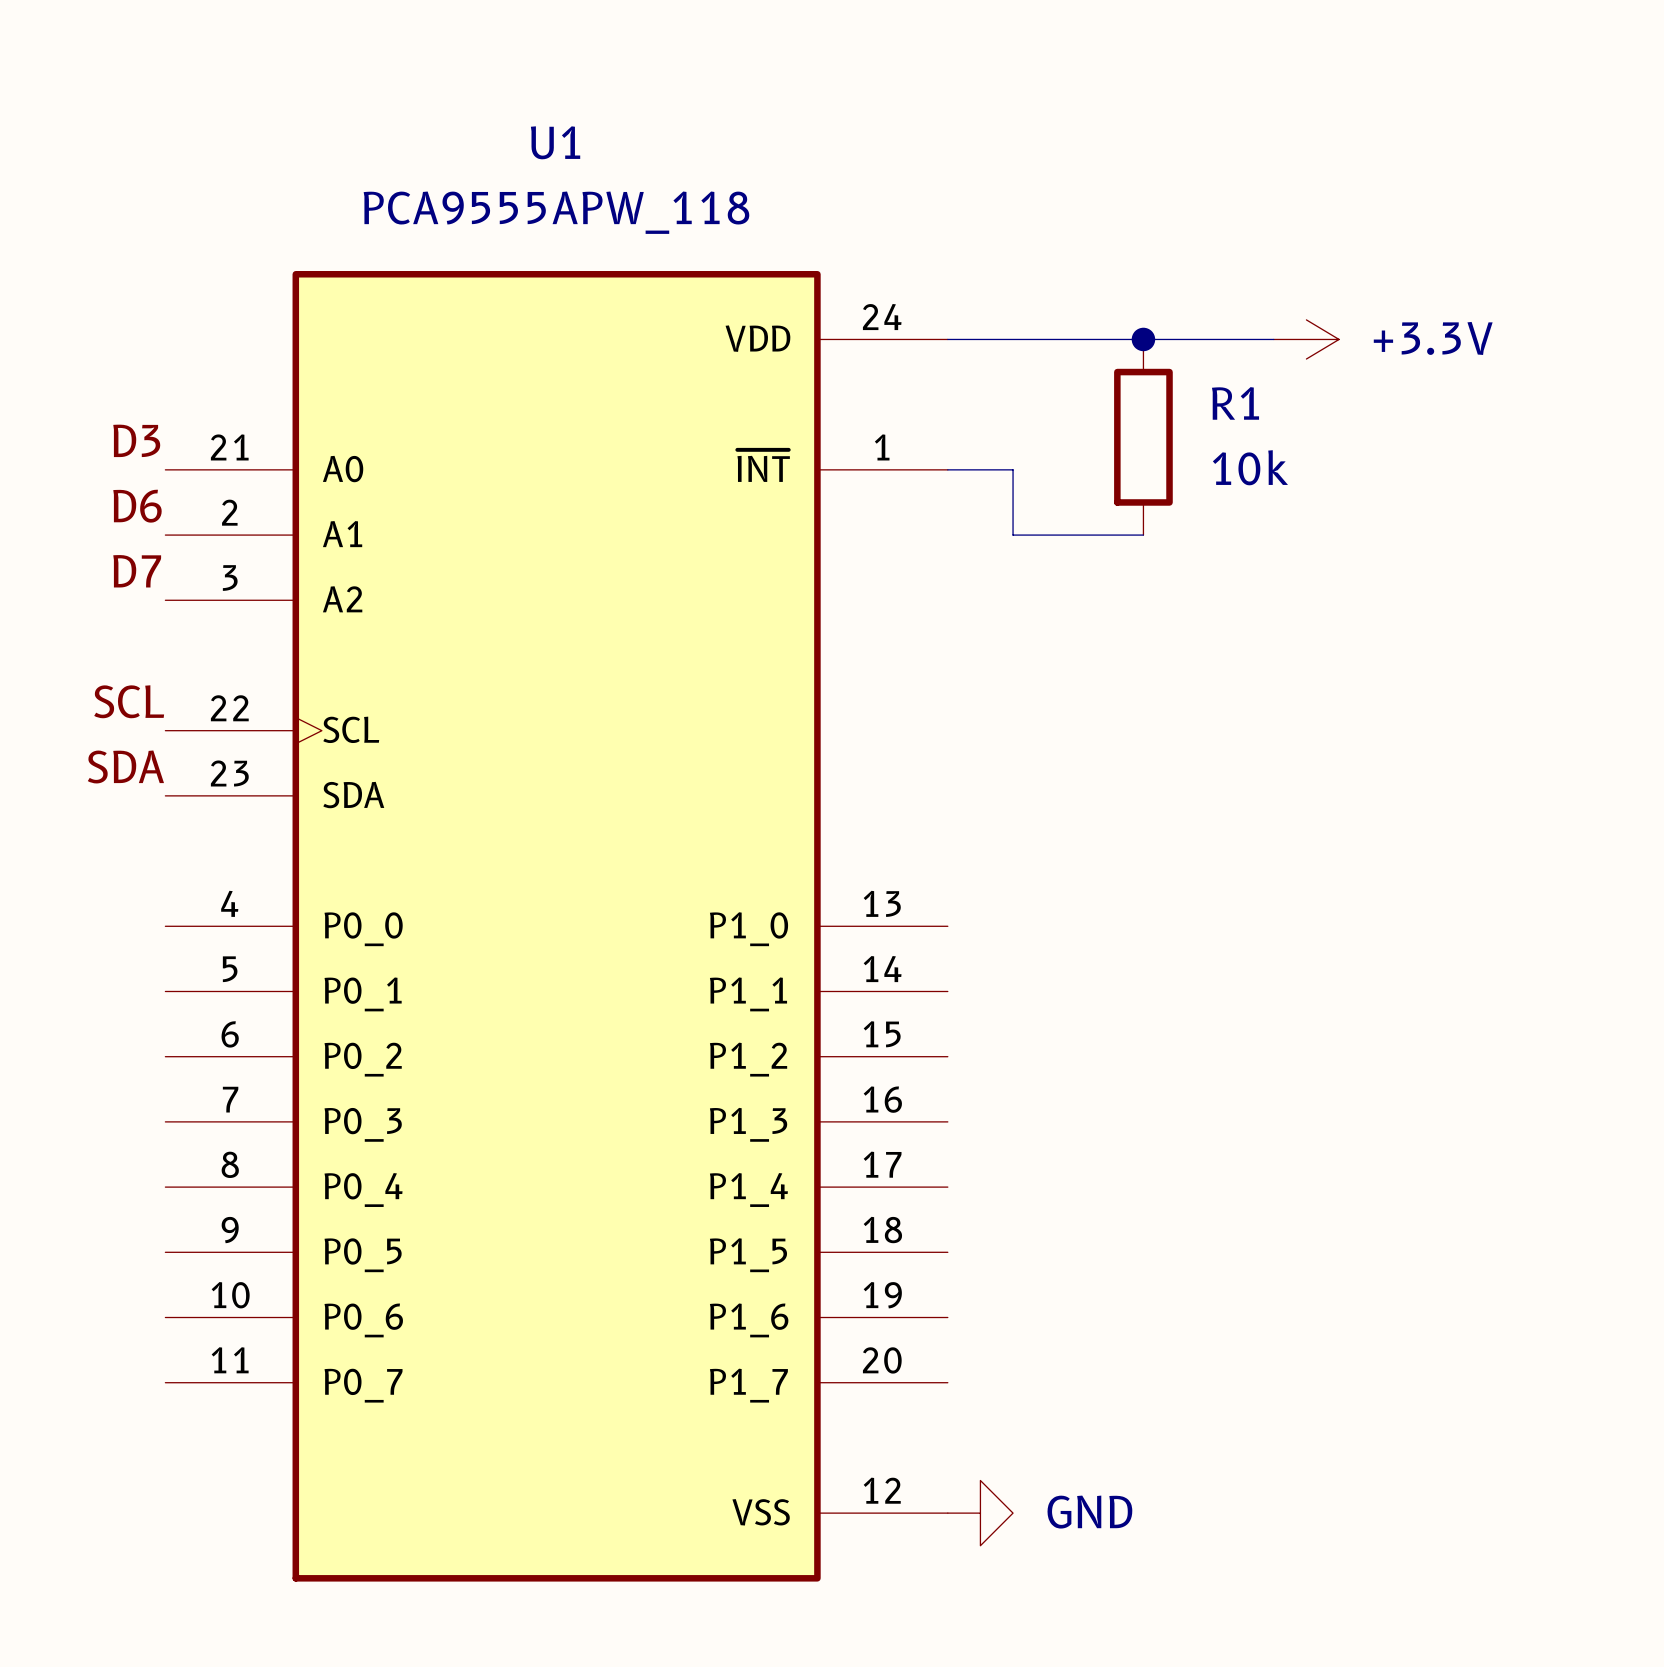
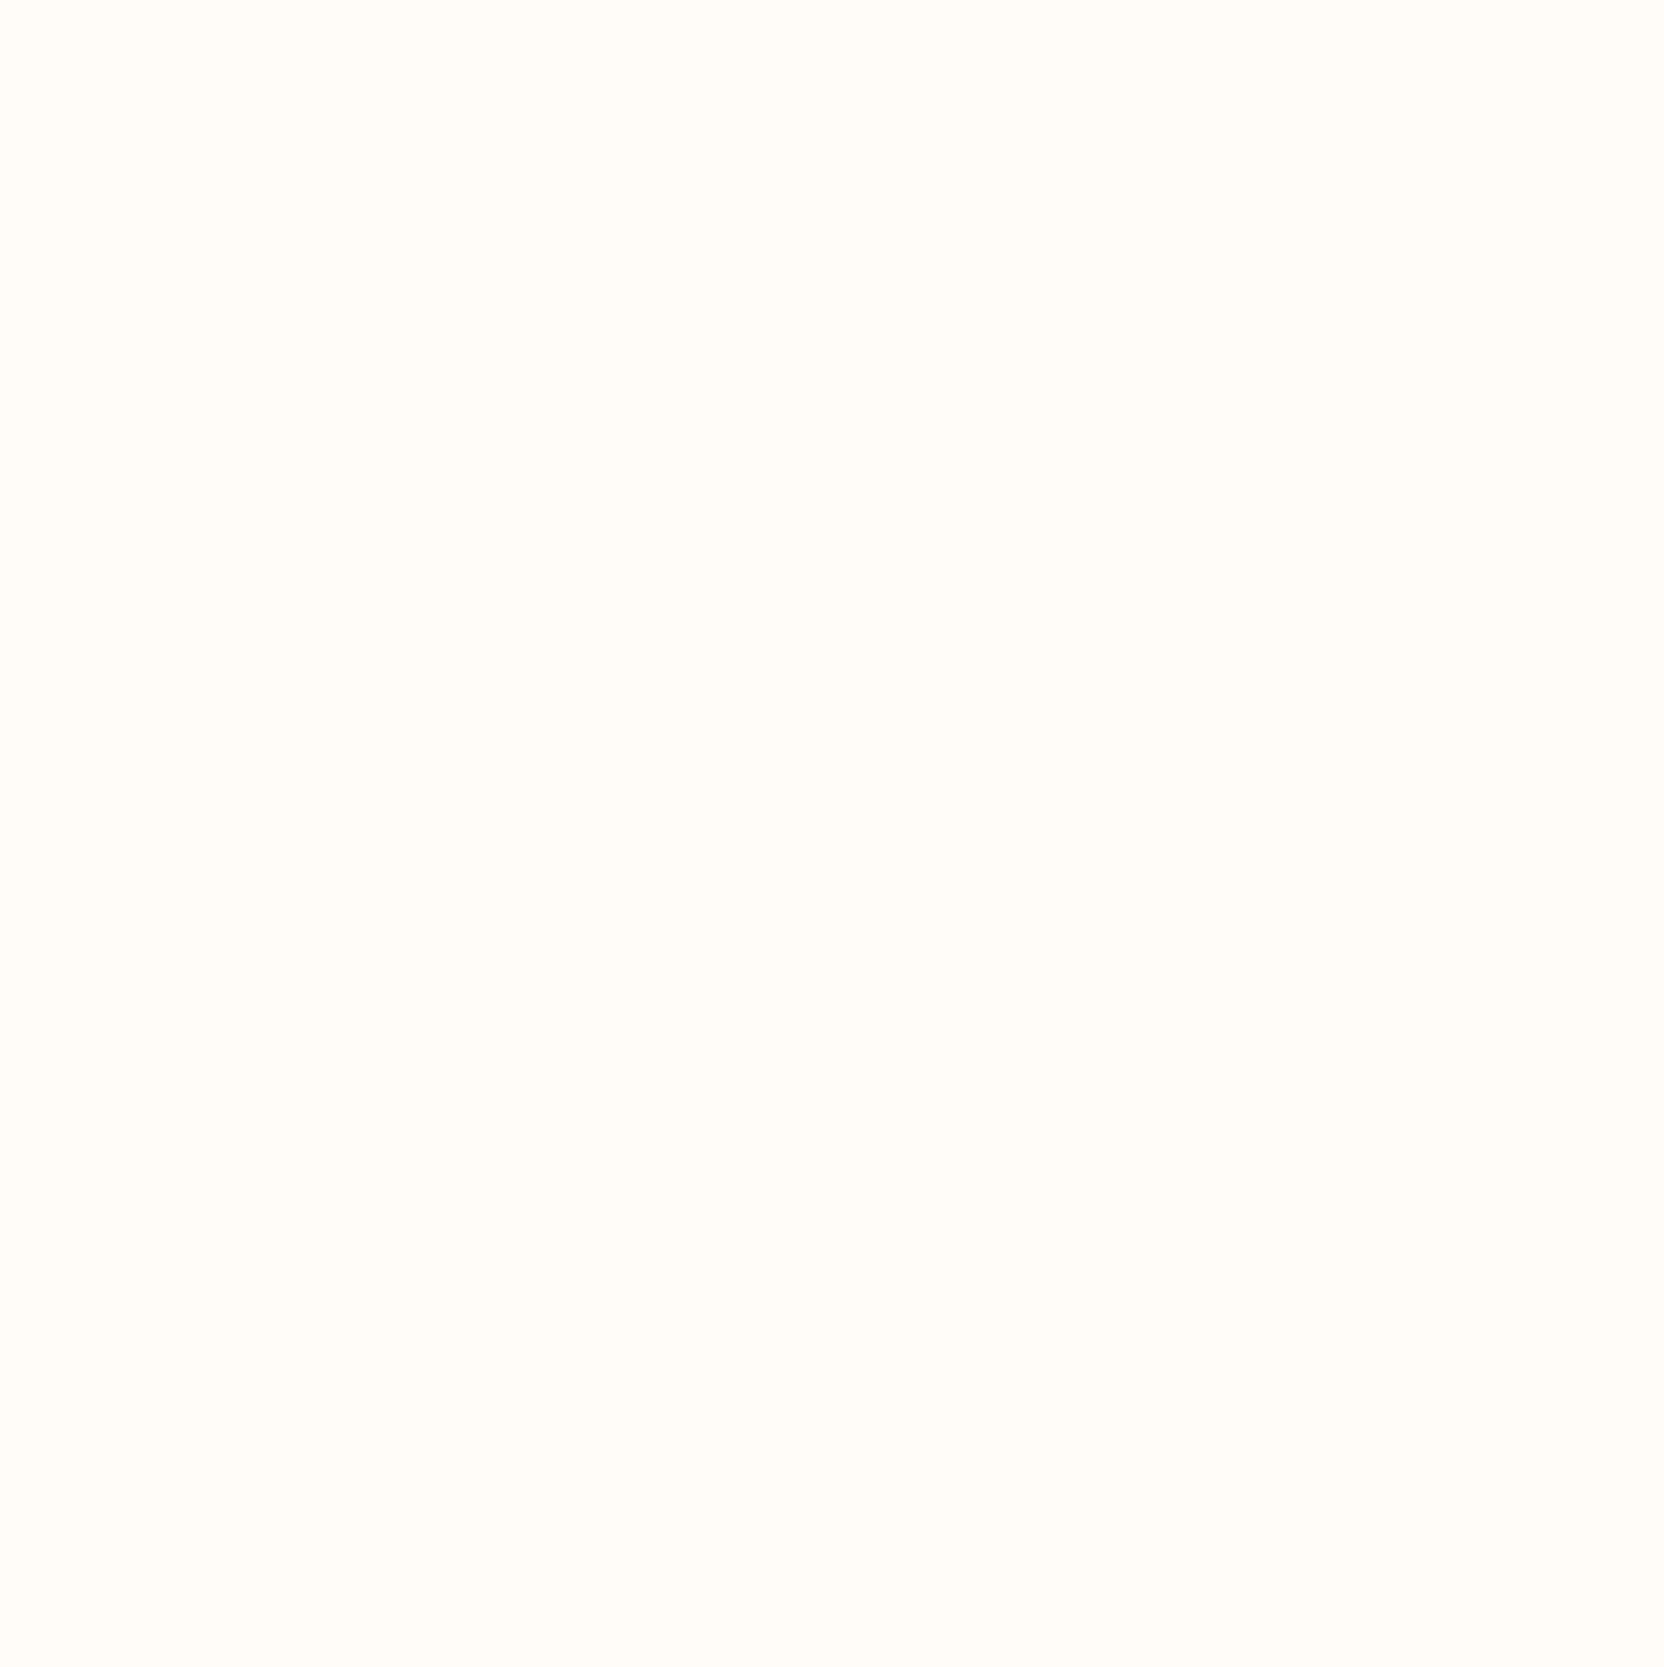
wire: (947, 339) (1273, 339) -> none
junction: (1143, 339) -> none
power symbol: +3.3V (1306, 339) -> none
R1: 10k (1143, 437) -> none
label: D3 (136, 440) -> none
wire: (947, 469) (1013, 469) (1013, 535) (1143, 535) -> none
label: D6 (137, 506) -> none
label: D7 (137, 571) -> none
label: SCL (129, 701) -> none
label: SDA (125, 766) -> none
U1: PCA9555APW_118 (556, 926) -> none
power symbol: GND (980, 1513) -> none

